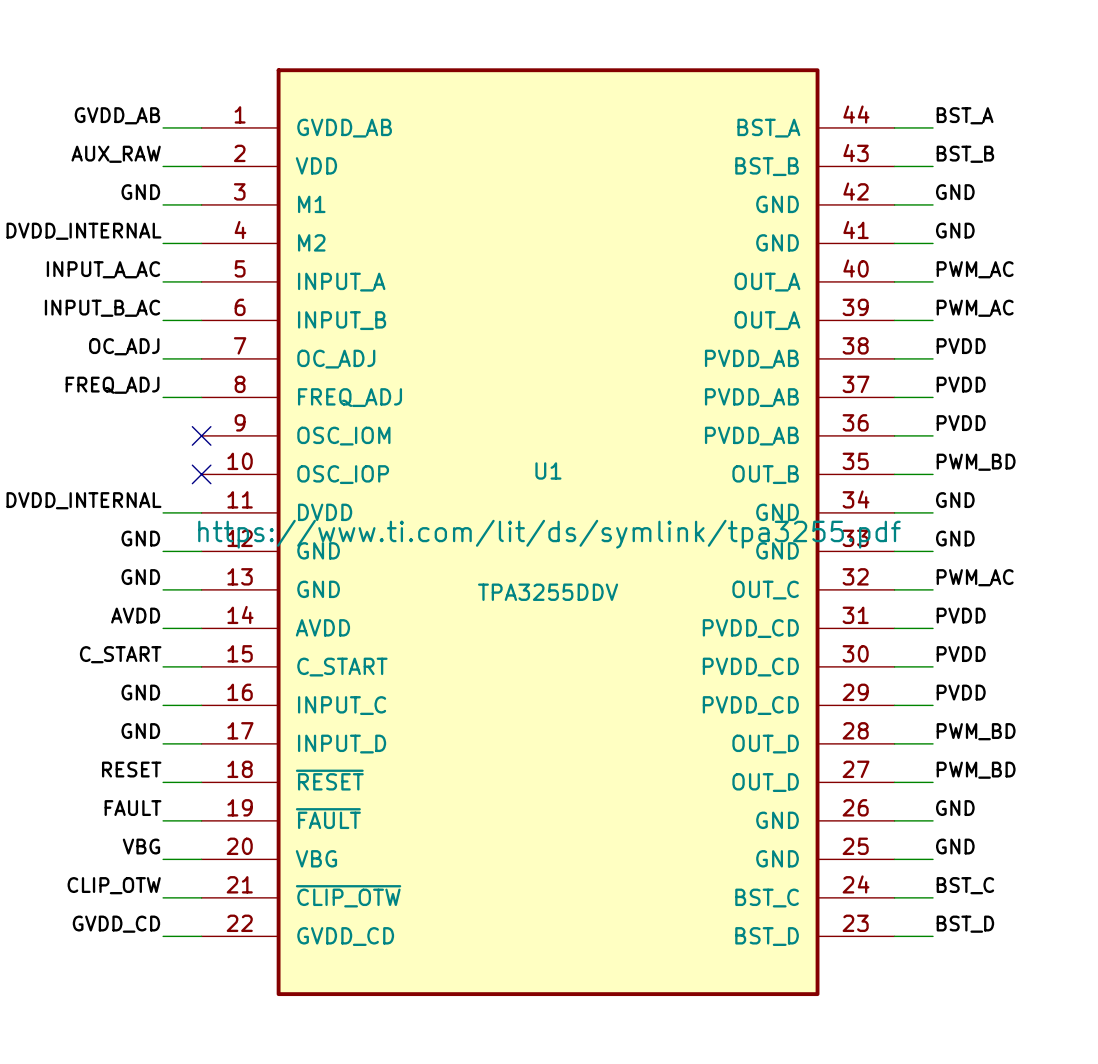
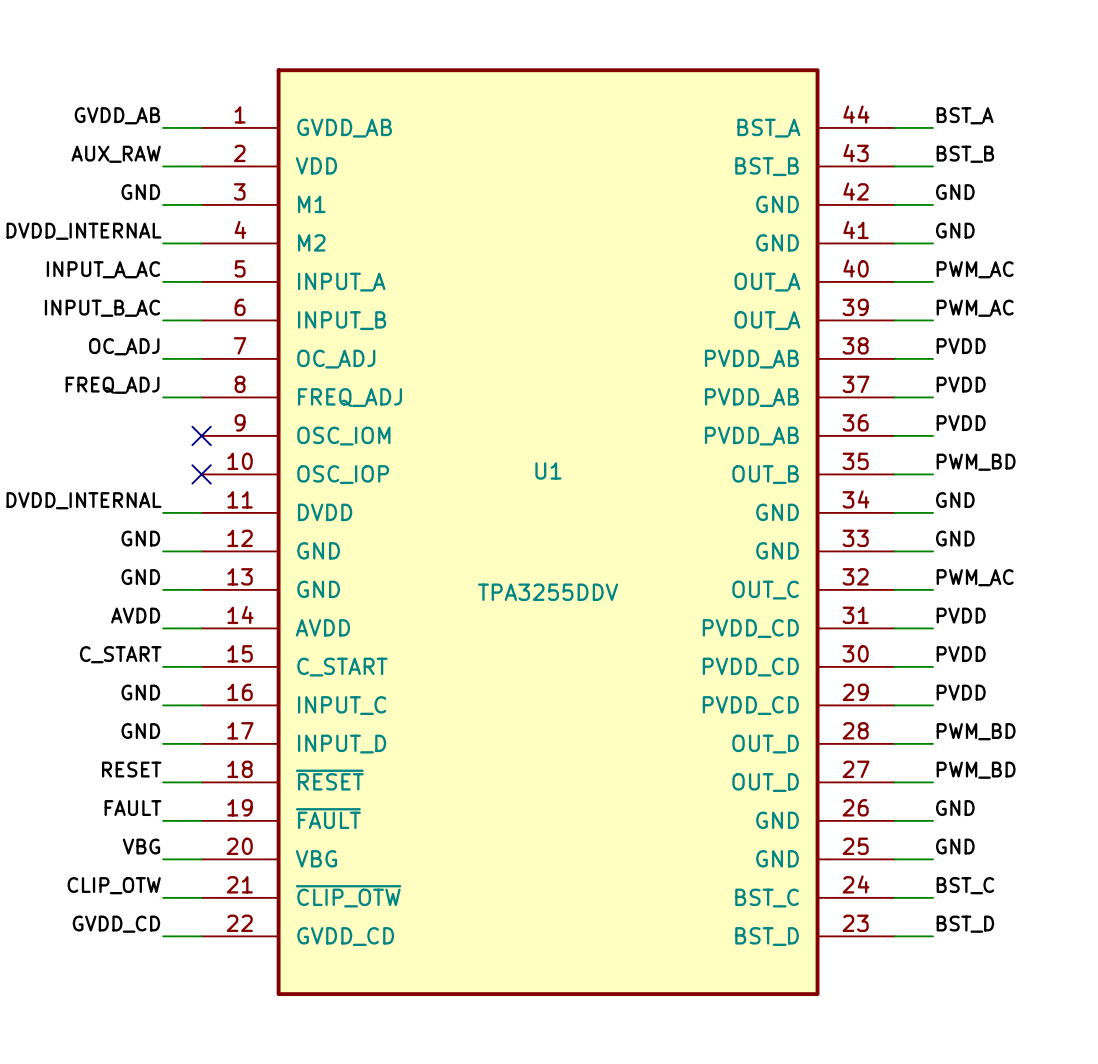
U1 text: https://www.ti.com/lit/ds/symlink/tpa3255.pdf (549, 534) -> none

